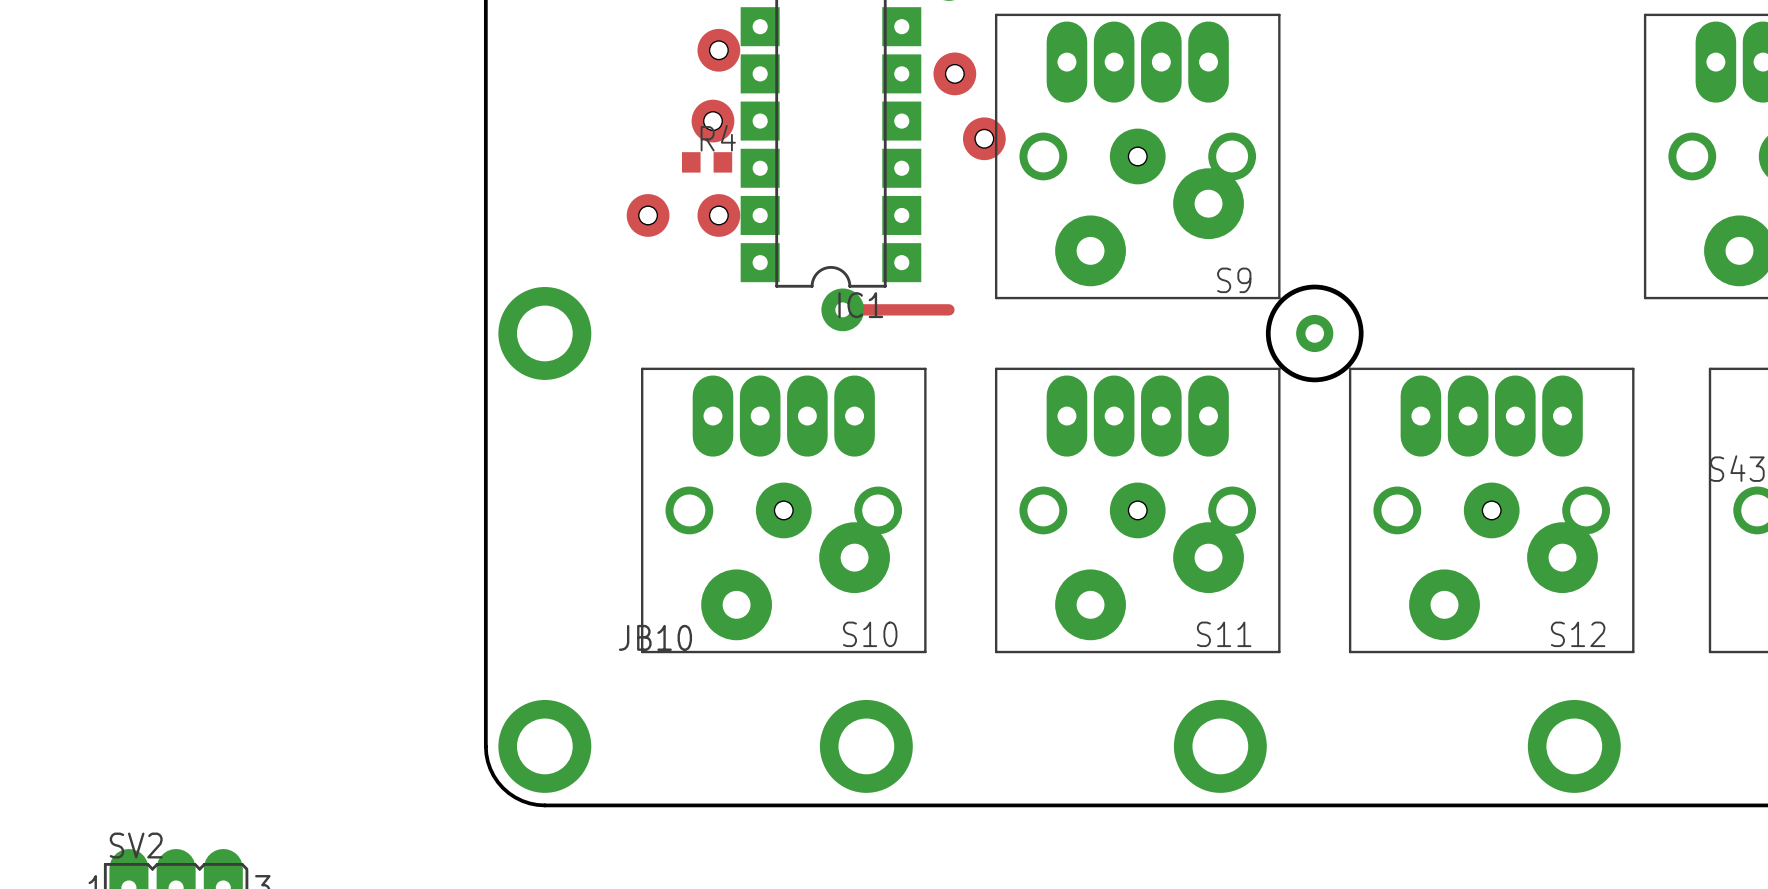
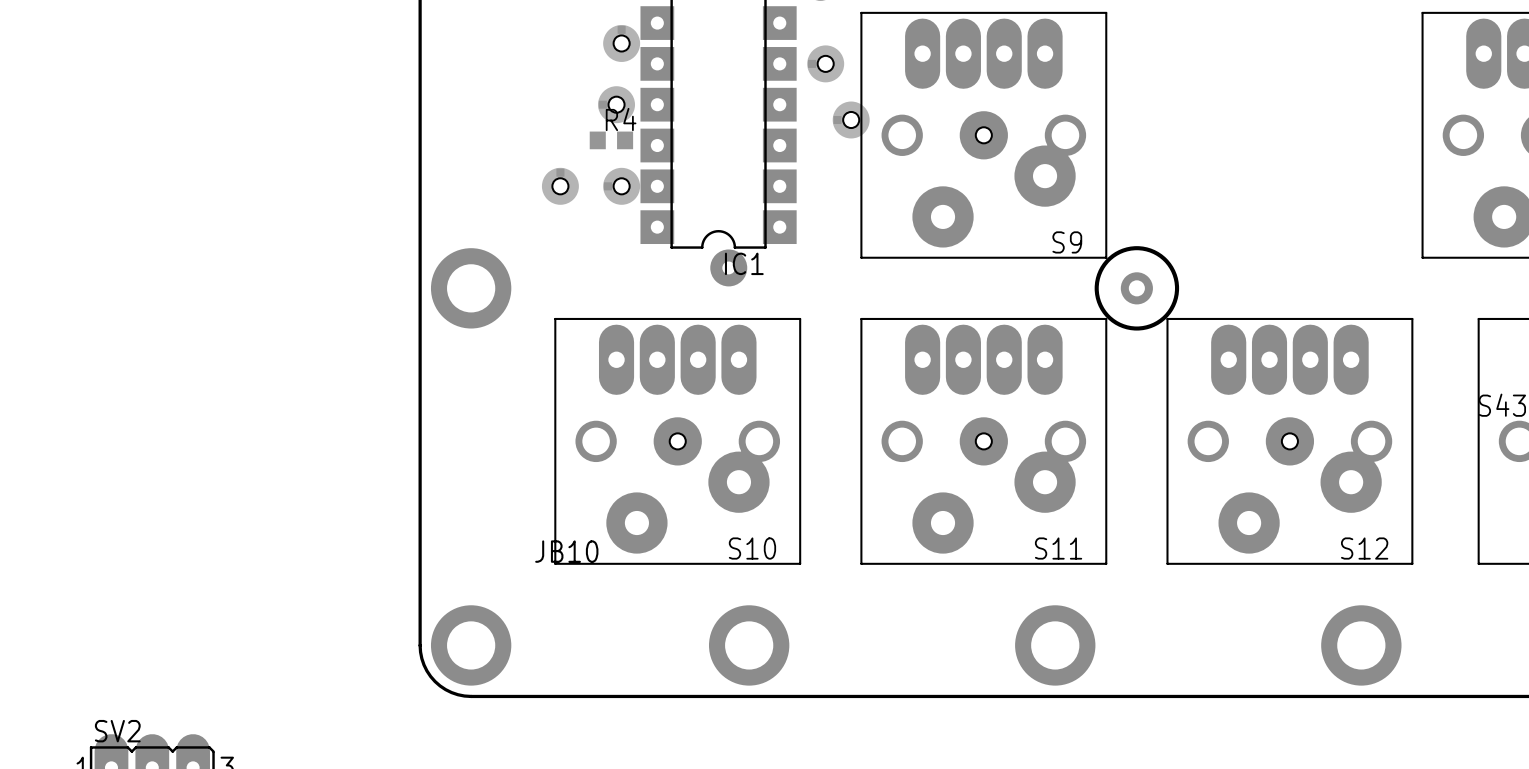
track: (842, 309) (948, 309) -> none

